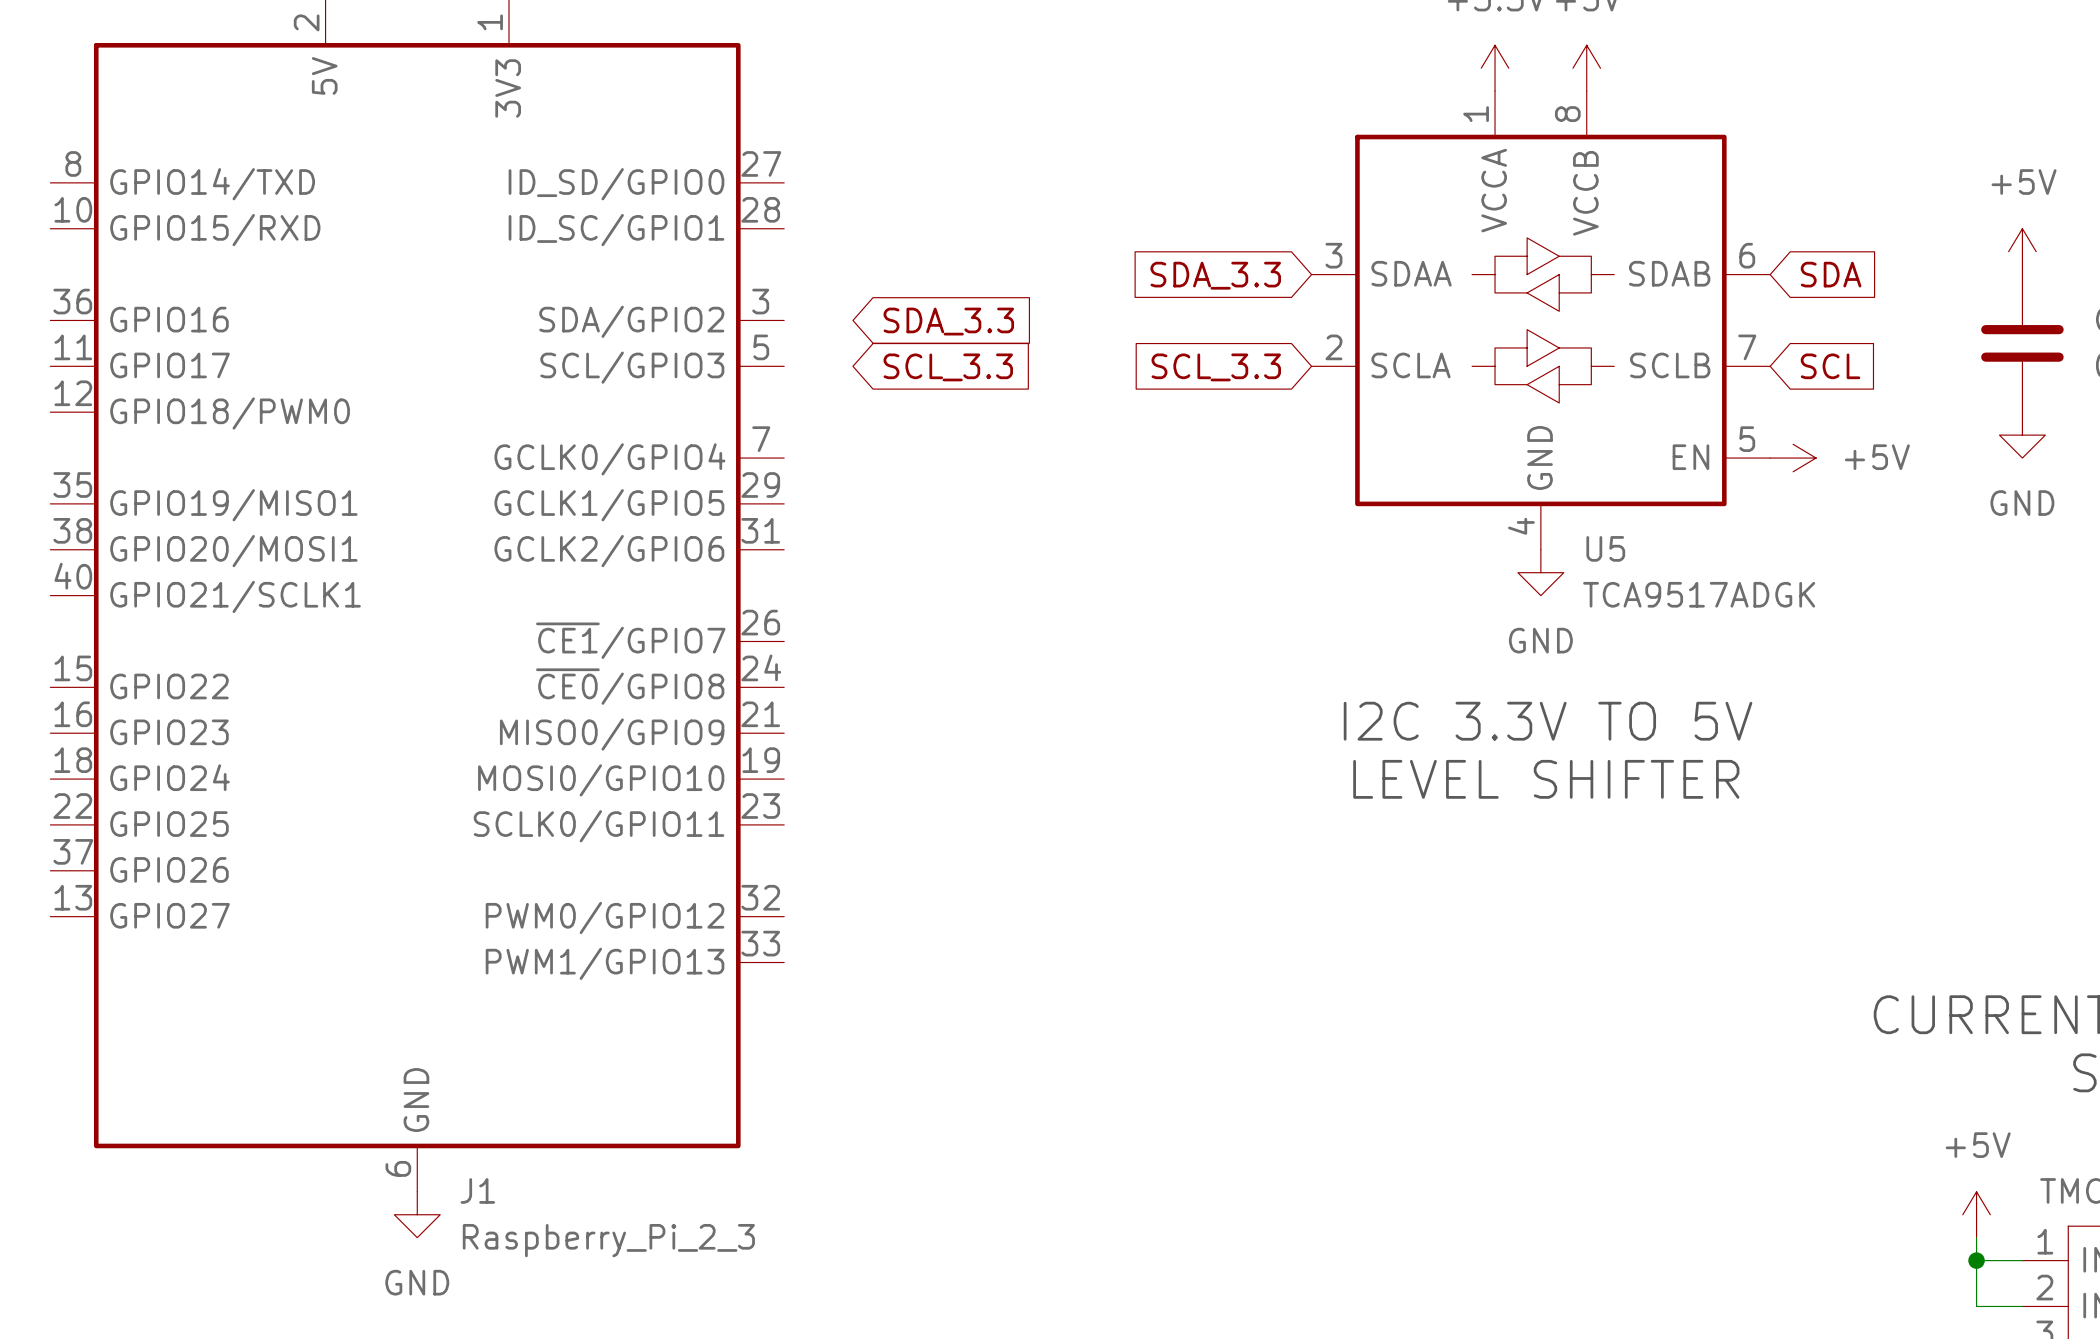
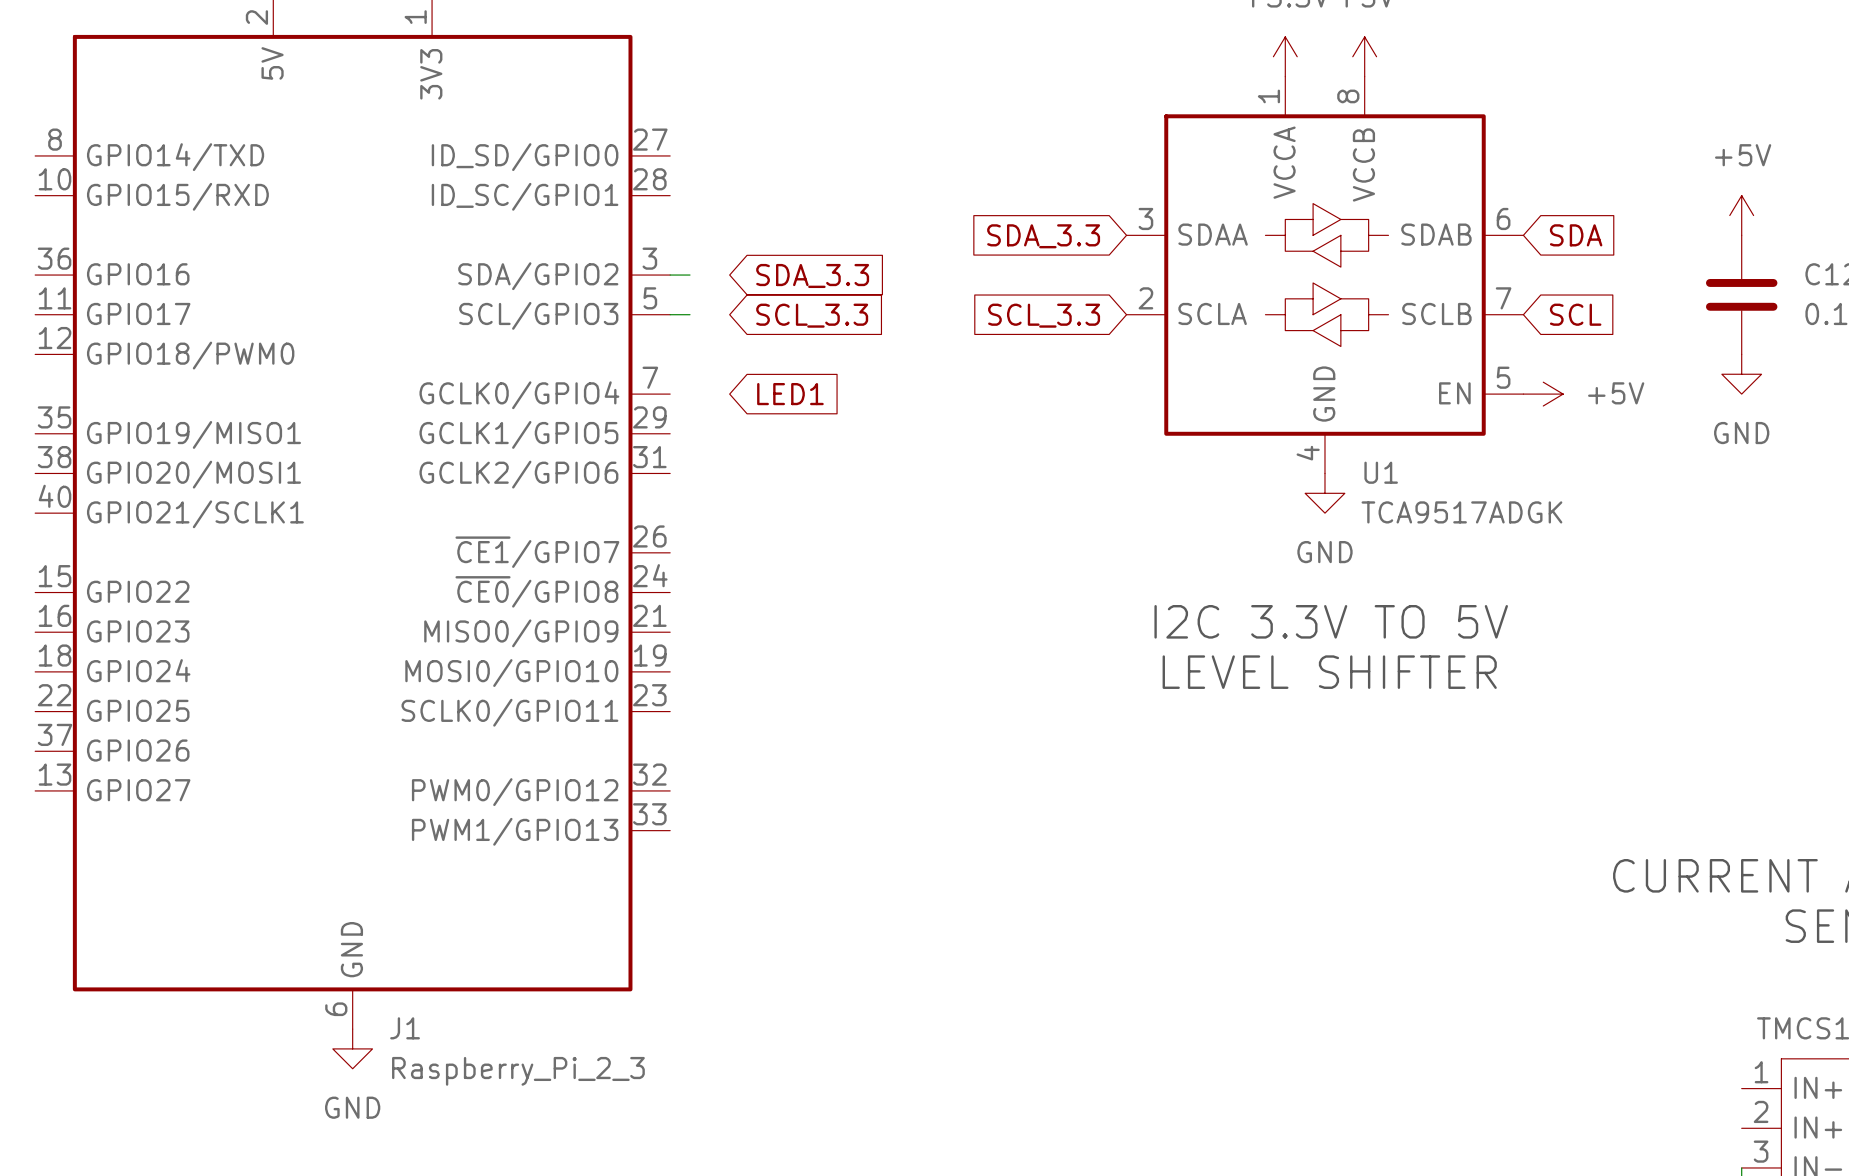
wire: none -> (670, 275) (690, 275)
wire: none -> (670, 314) (690, 314)
global label: none -> LED1 (790, 394)
U5 name: U5 (1605, 548) -> U1 (1381, 472)
power symbol: +5V (1976, 1214) -> none
wire: (1976, 1237) (1976, 1306) (2022, 1306) -> none
wire: (1976, 1260) (2022, 1260) -> none
junction: (1976, 1260) -> none

